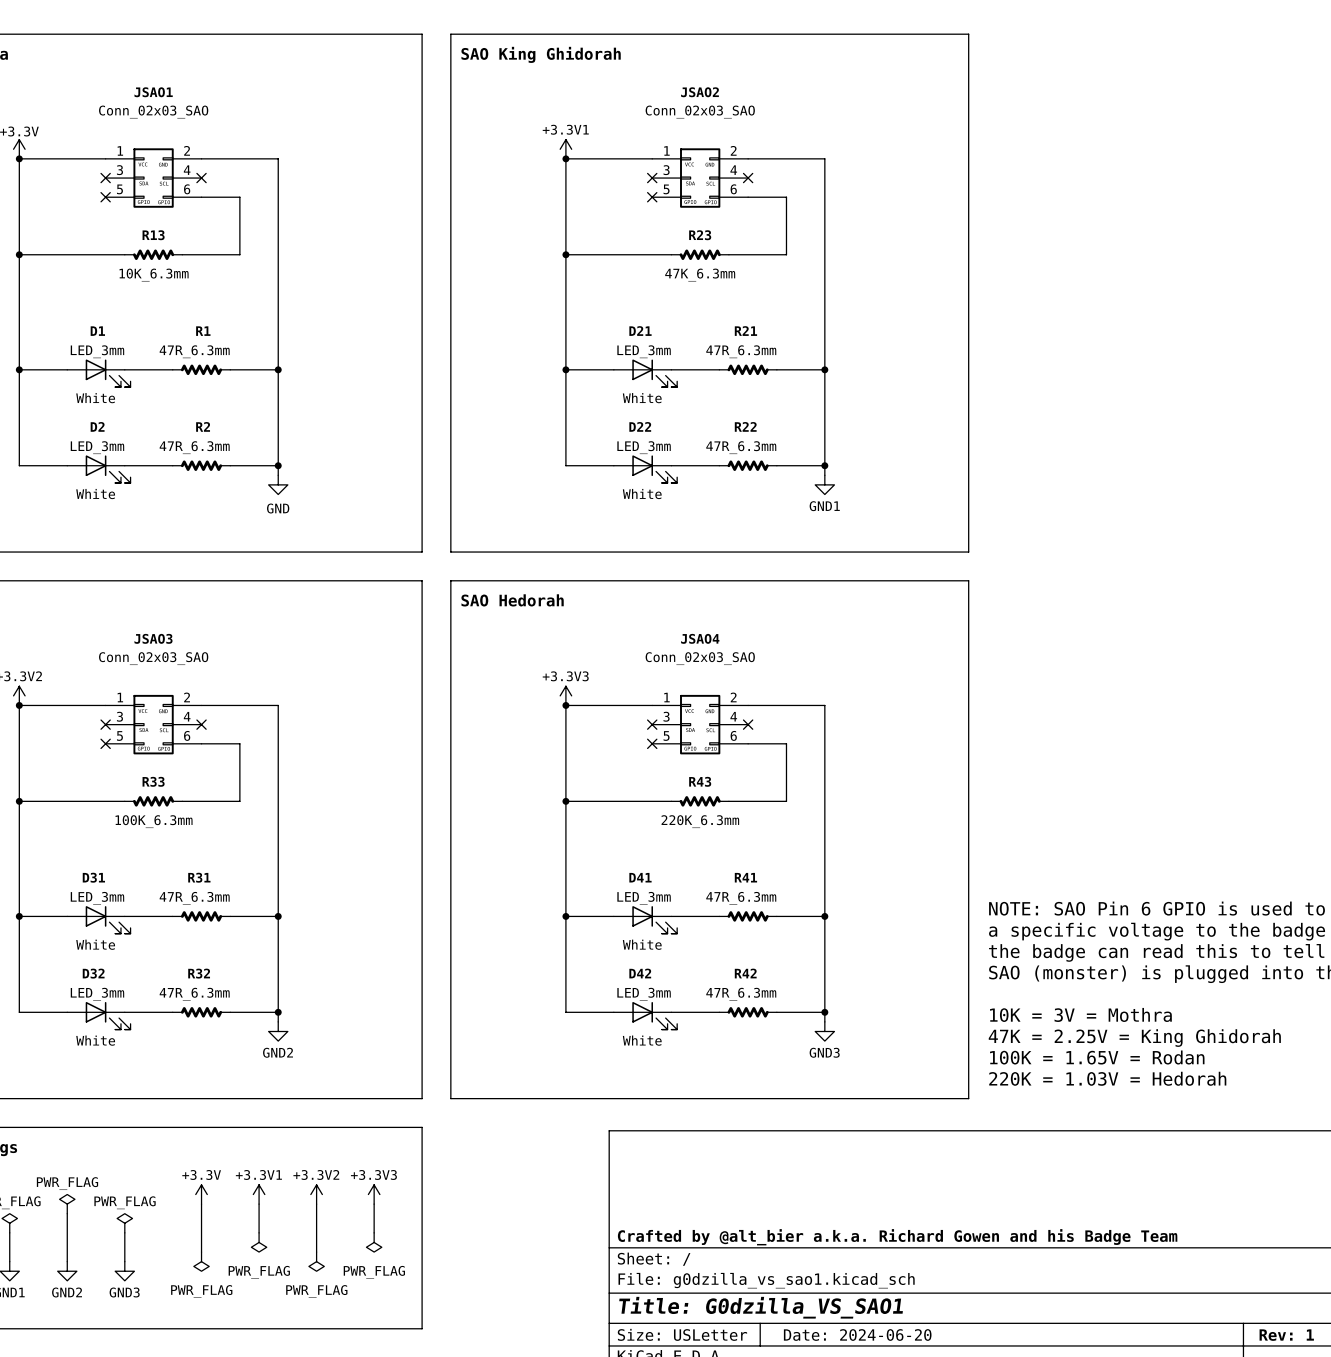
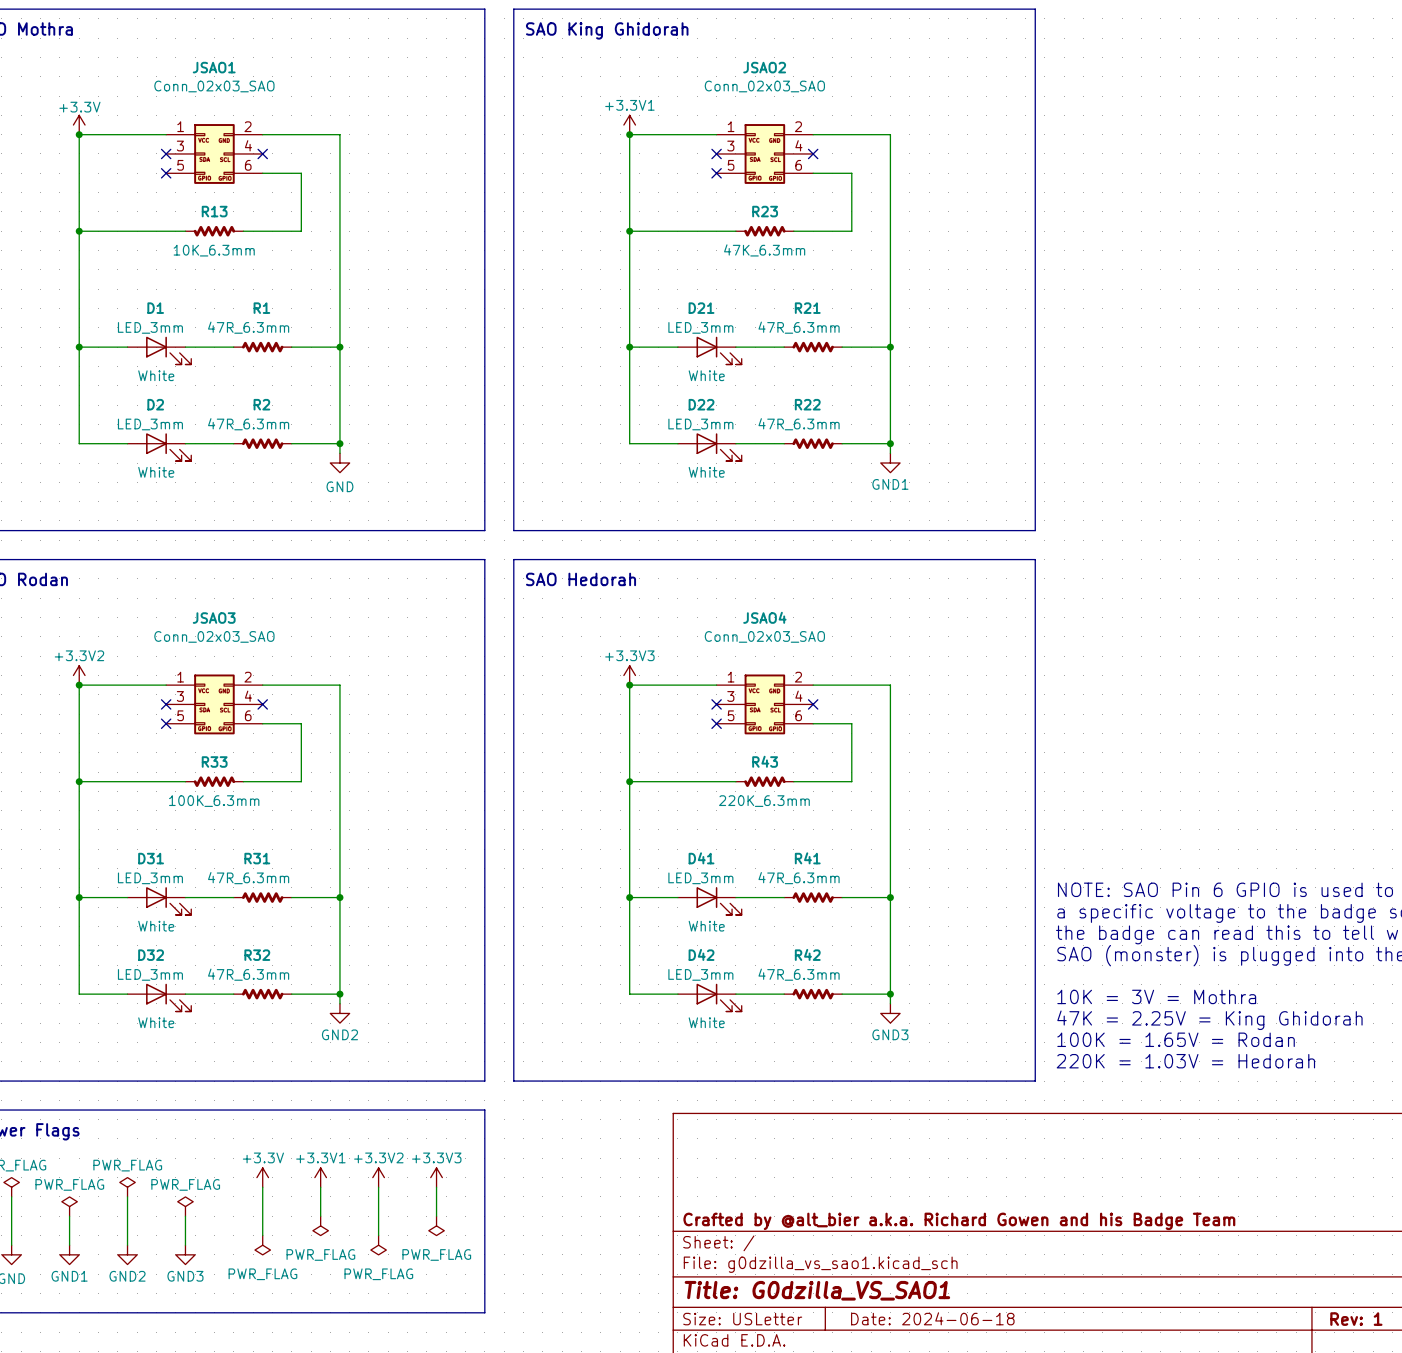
title block: Date: 2024-06-20 (857, 1335) -> Date: 2024-06-18 (932, 1318)

